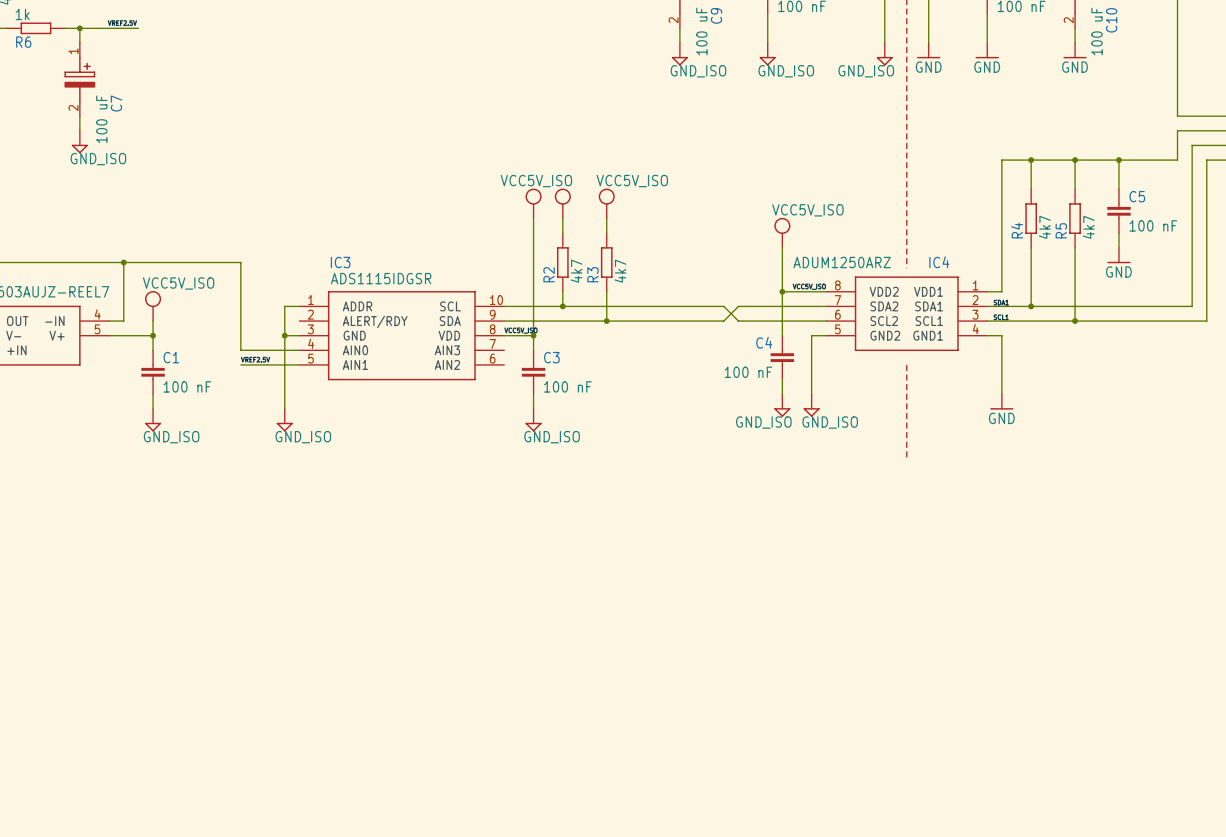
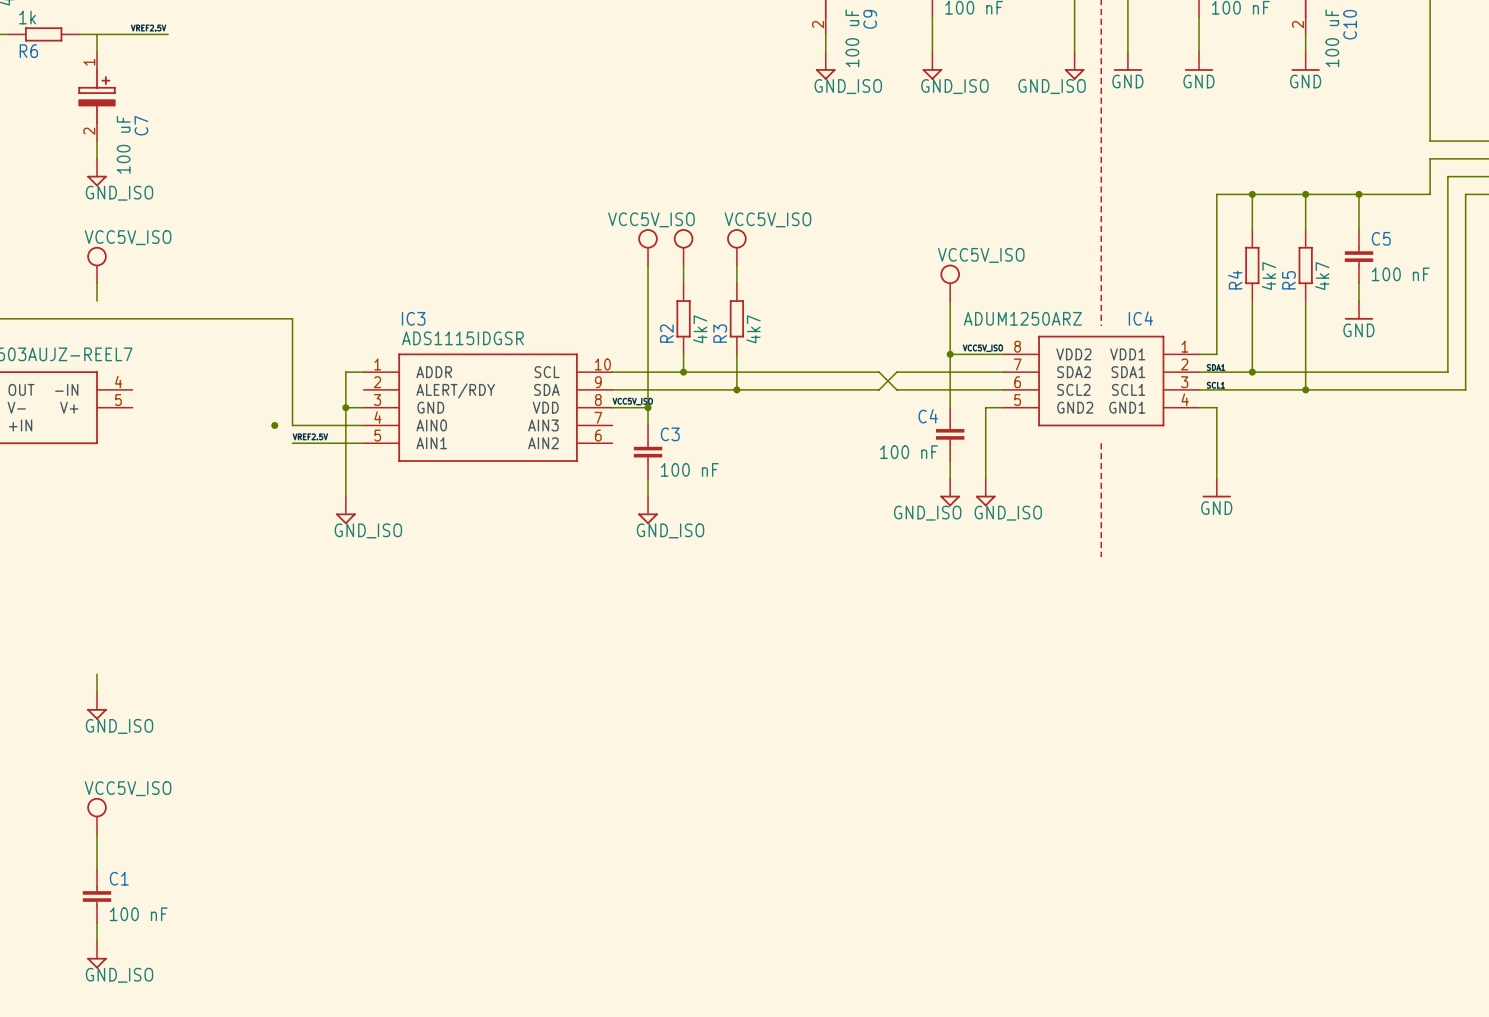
junction: (79, 28) -> none
wire: none -> (97, 283) (97, 301)
wire: (123, 262) (123, 321) (109, 321) -> none
junction: (123, 262) -> none
power symbol position: VCC5V_ISO (153, 306) -> VCC5V_ISO (97, 265)
wire: (153, 321) (153, 350) -> none
wire: (109, 335) (153, 335) -> none
junction: (153, 335) -> none
junction: none -> (274, 425)
C1 position: (153, 372) -> (97, 896)
wire: (153, 394) (153, 408) -> none
power symbol: GND_ISO (153, 420) -> none
wire: none -> (97, 674) (97, 692)
power symbol: none -> GND_ISO (97, 705)
power symbol: none -> VCC5V_ISO (97, 816)
wire: none -> (97, 834) (97, 869)
wire: none -> (97, 923) (97, 940)
power symbol: none -> GND_ISO (97, 954)

